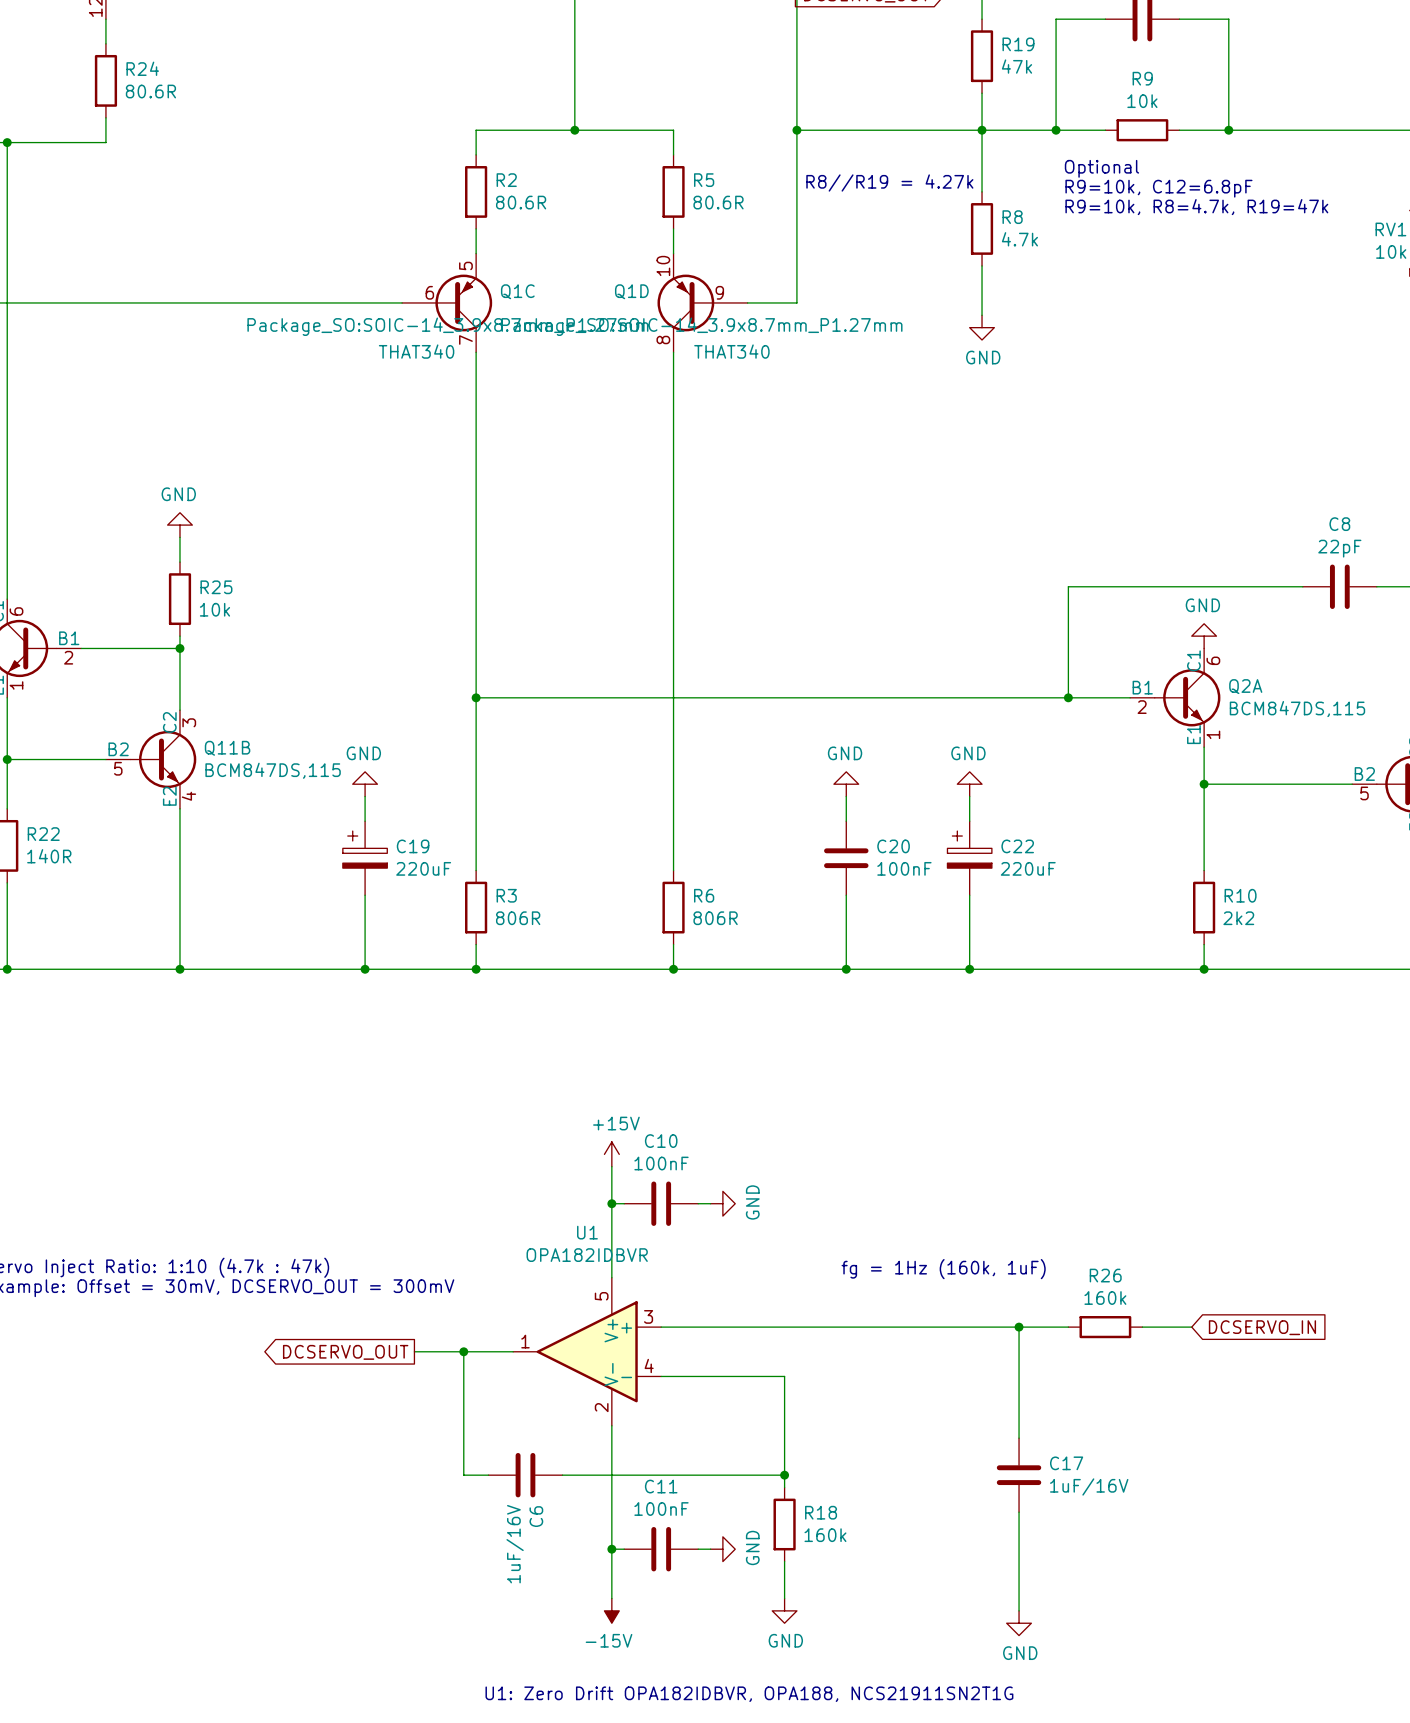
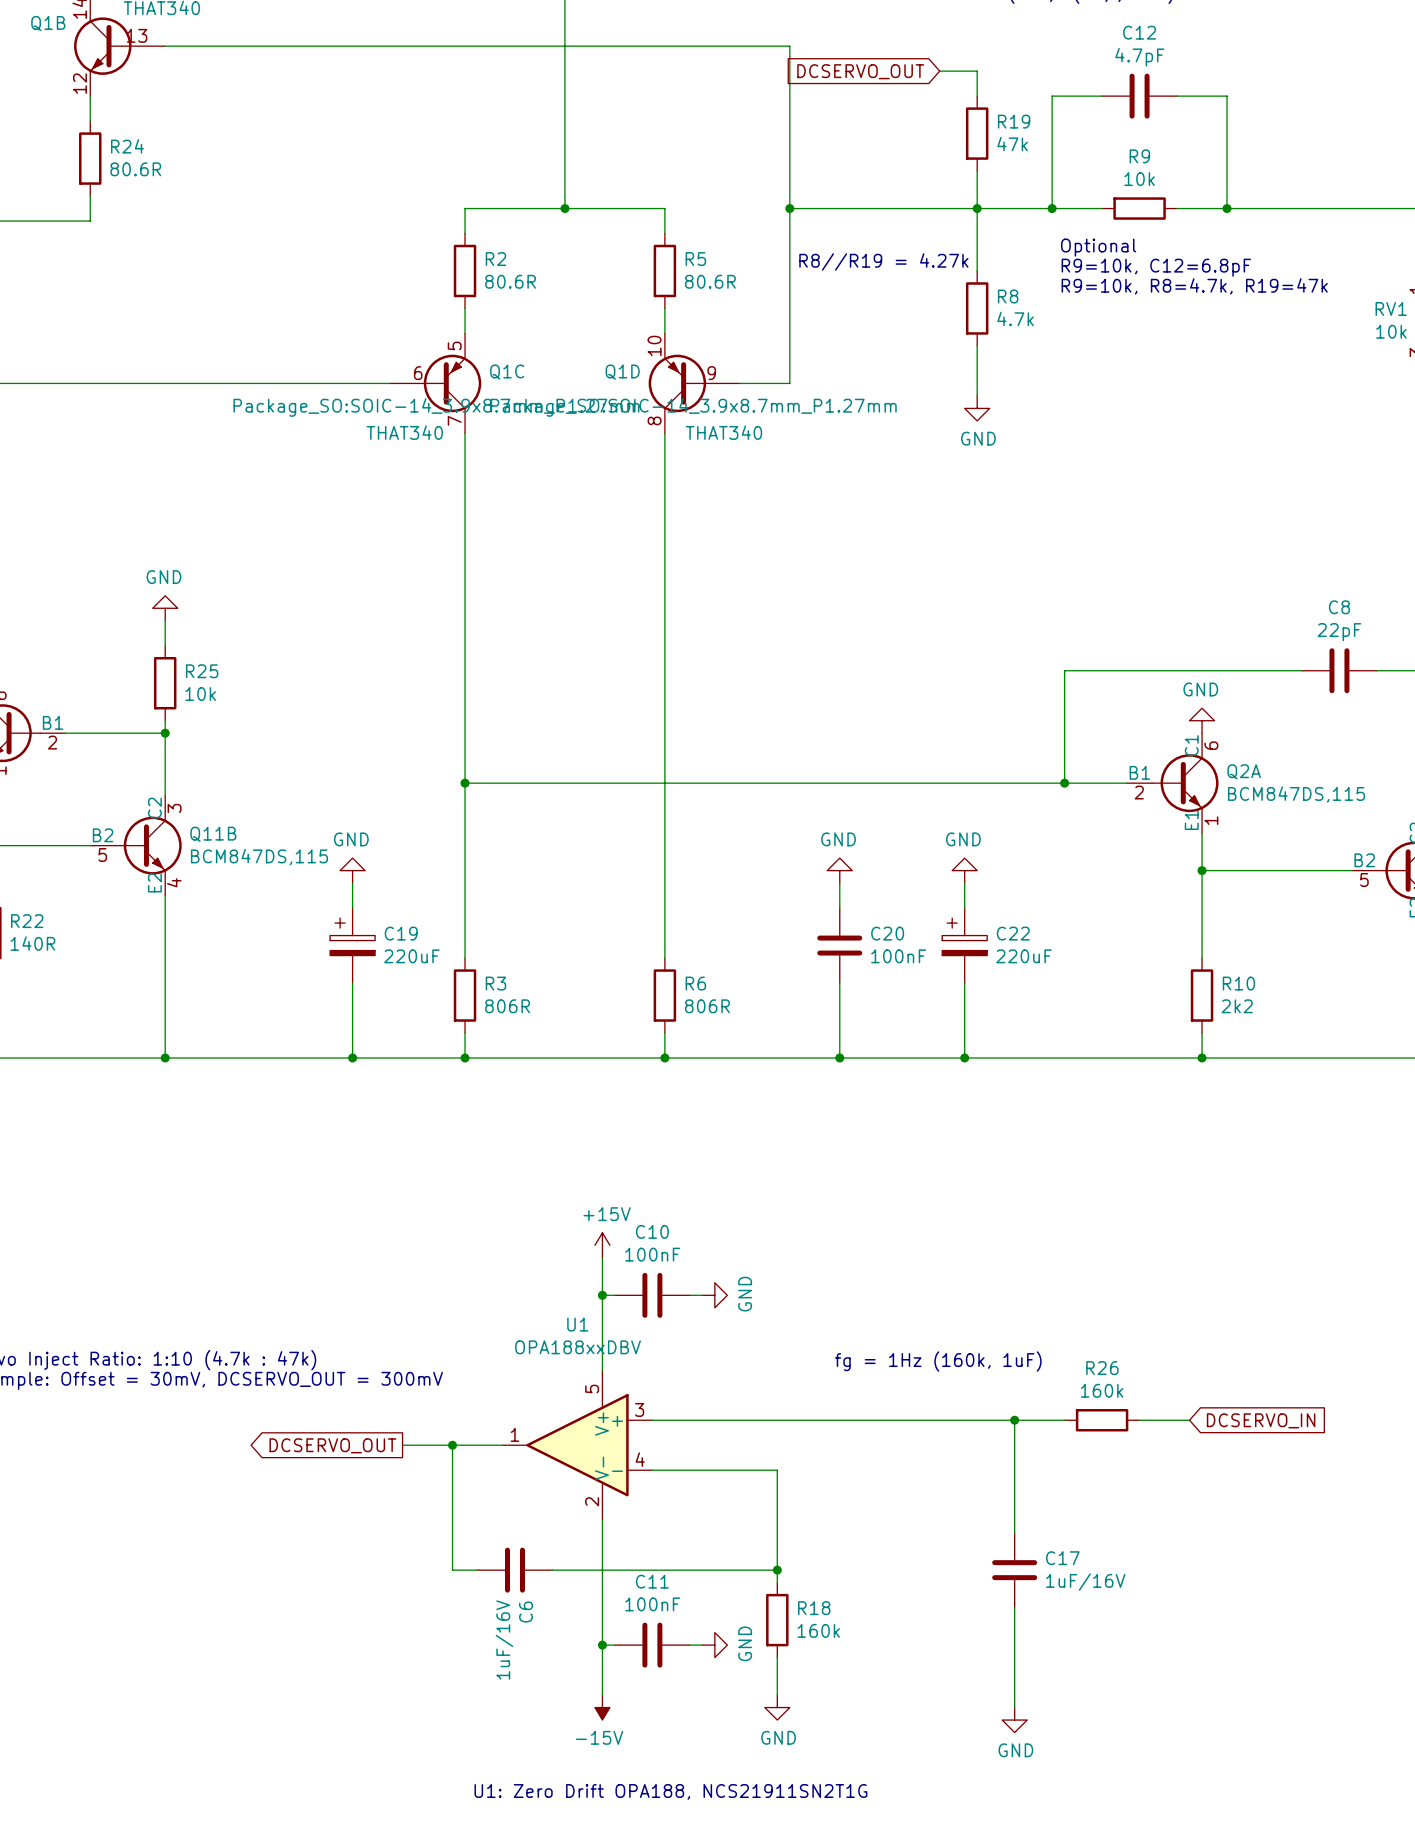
U1 value: OPA182IDBVR (587, 1255) -> OPA188xxDBV (578, 1347)
text: U1: Zero Drift OPA182IDBVR, OPA188, NCS21911SN2T1G (749, 1694) -> U1: Zero Drift OPA188, NCS21911SN2T1G (670, 1791)

